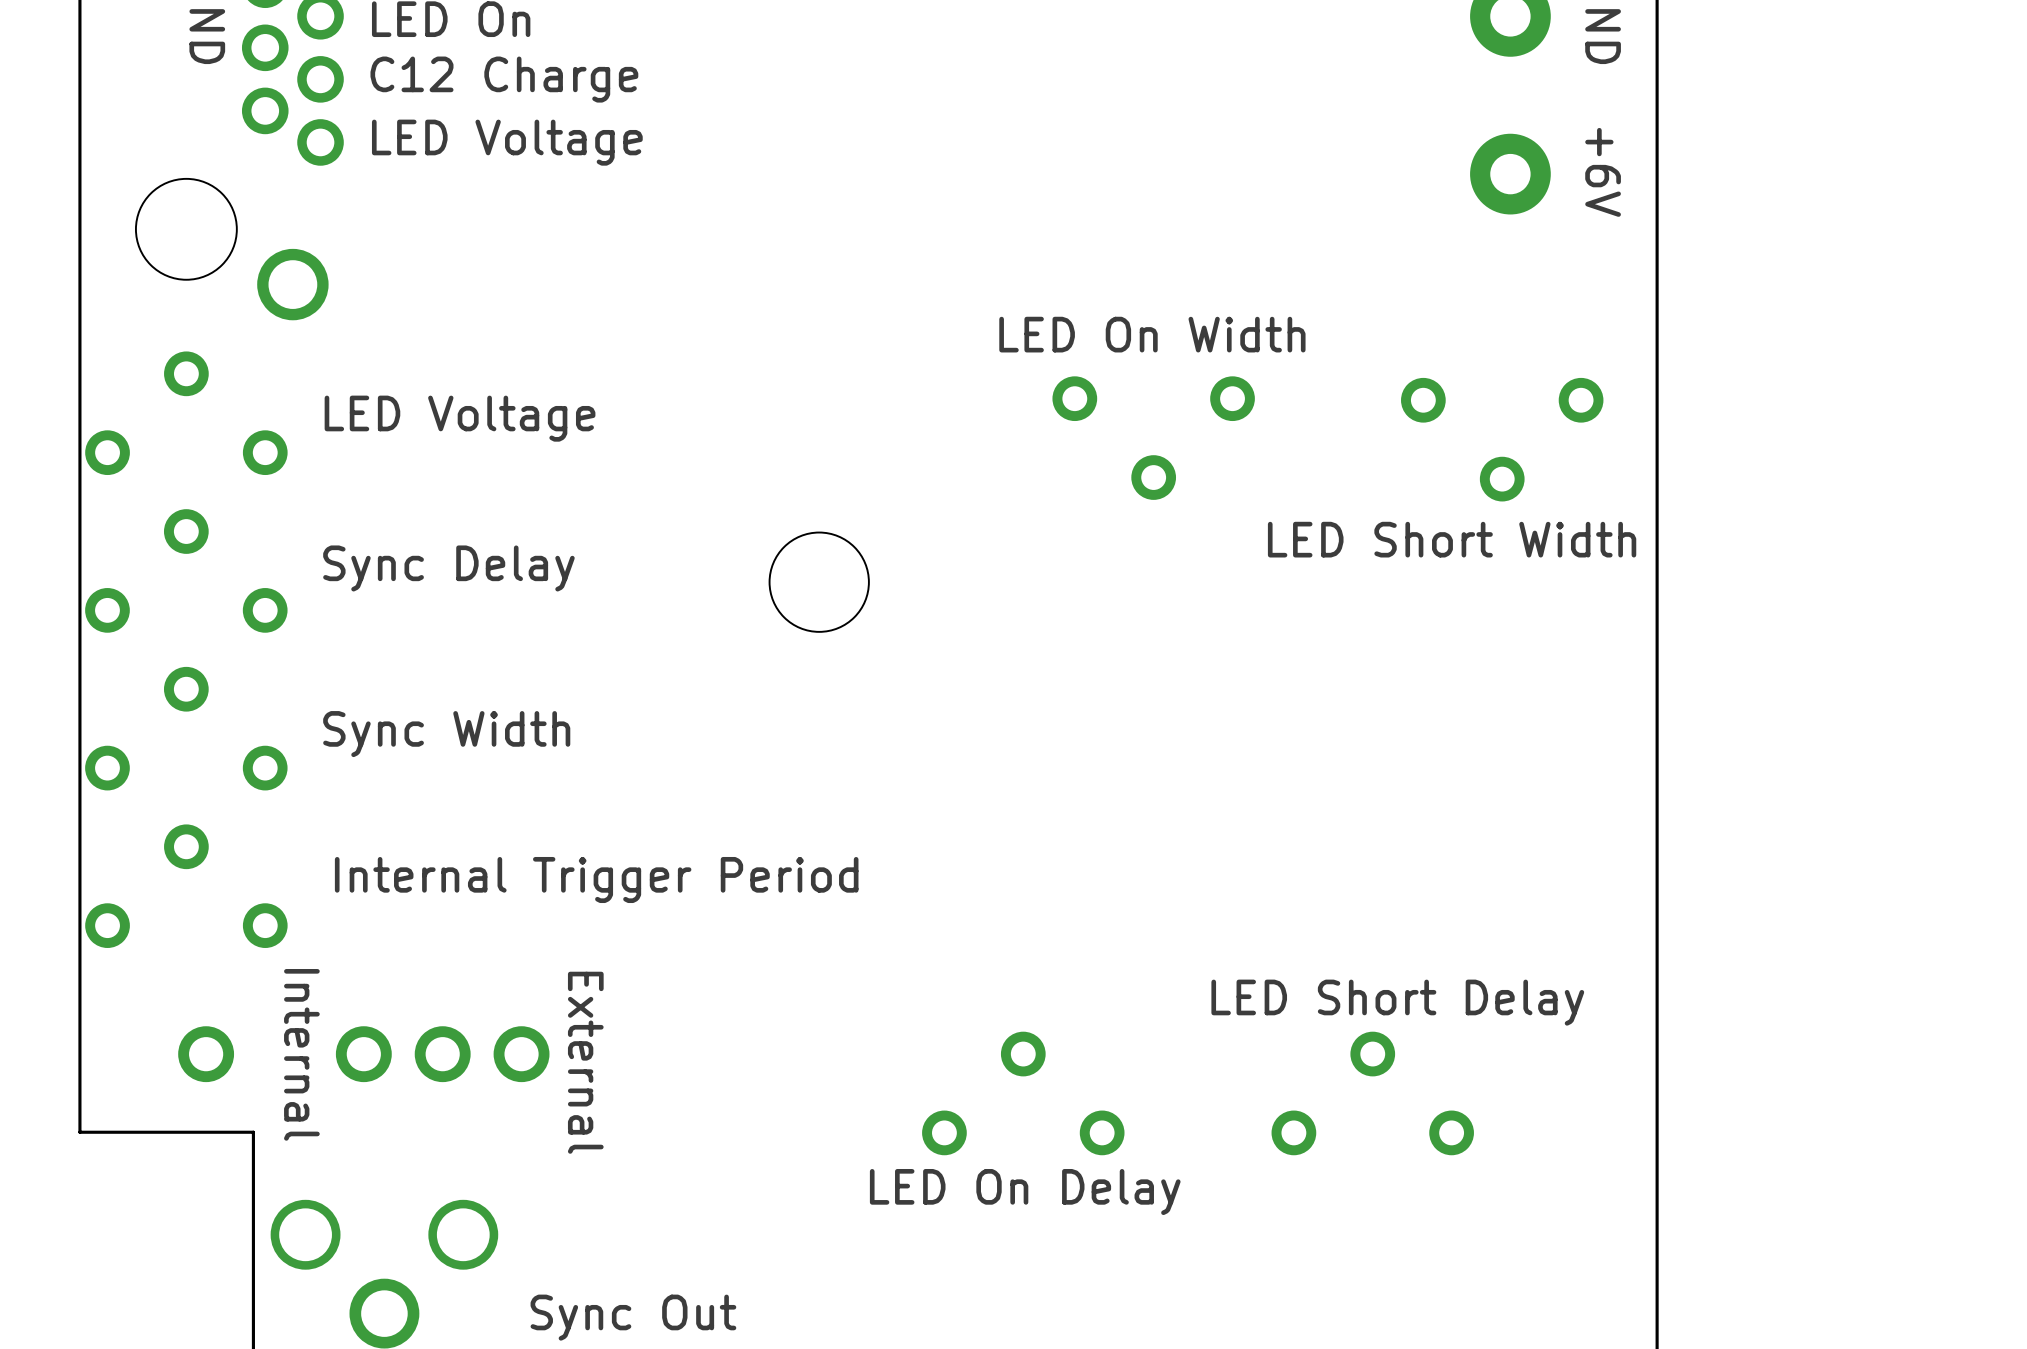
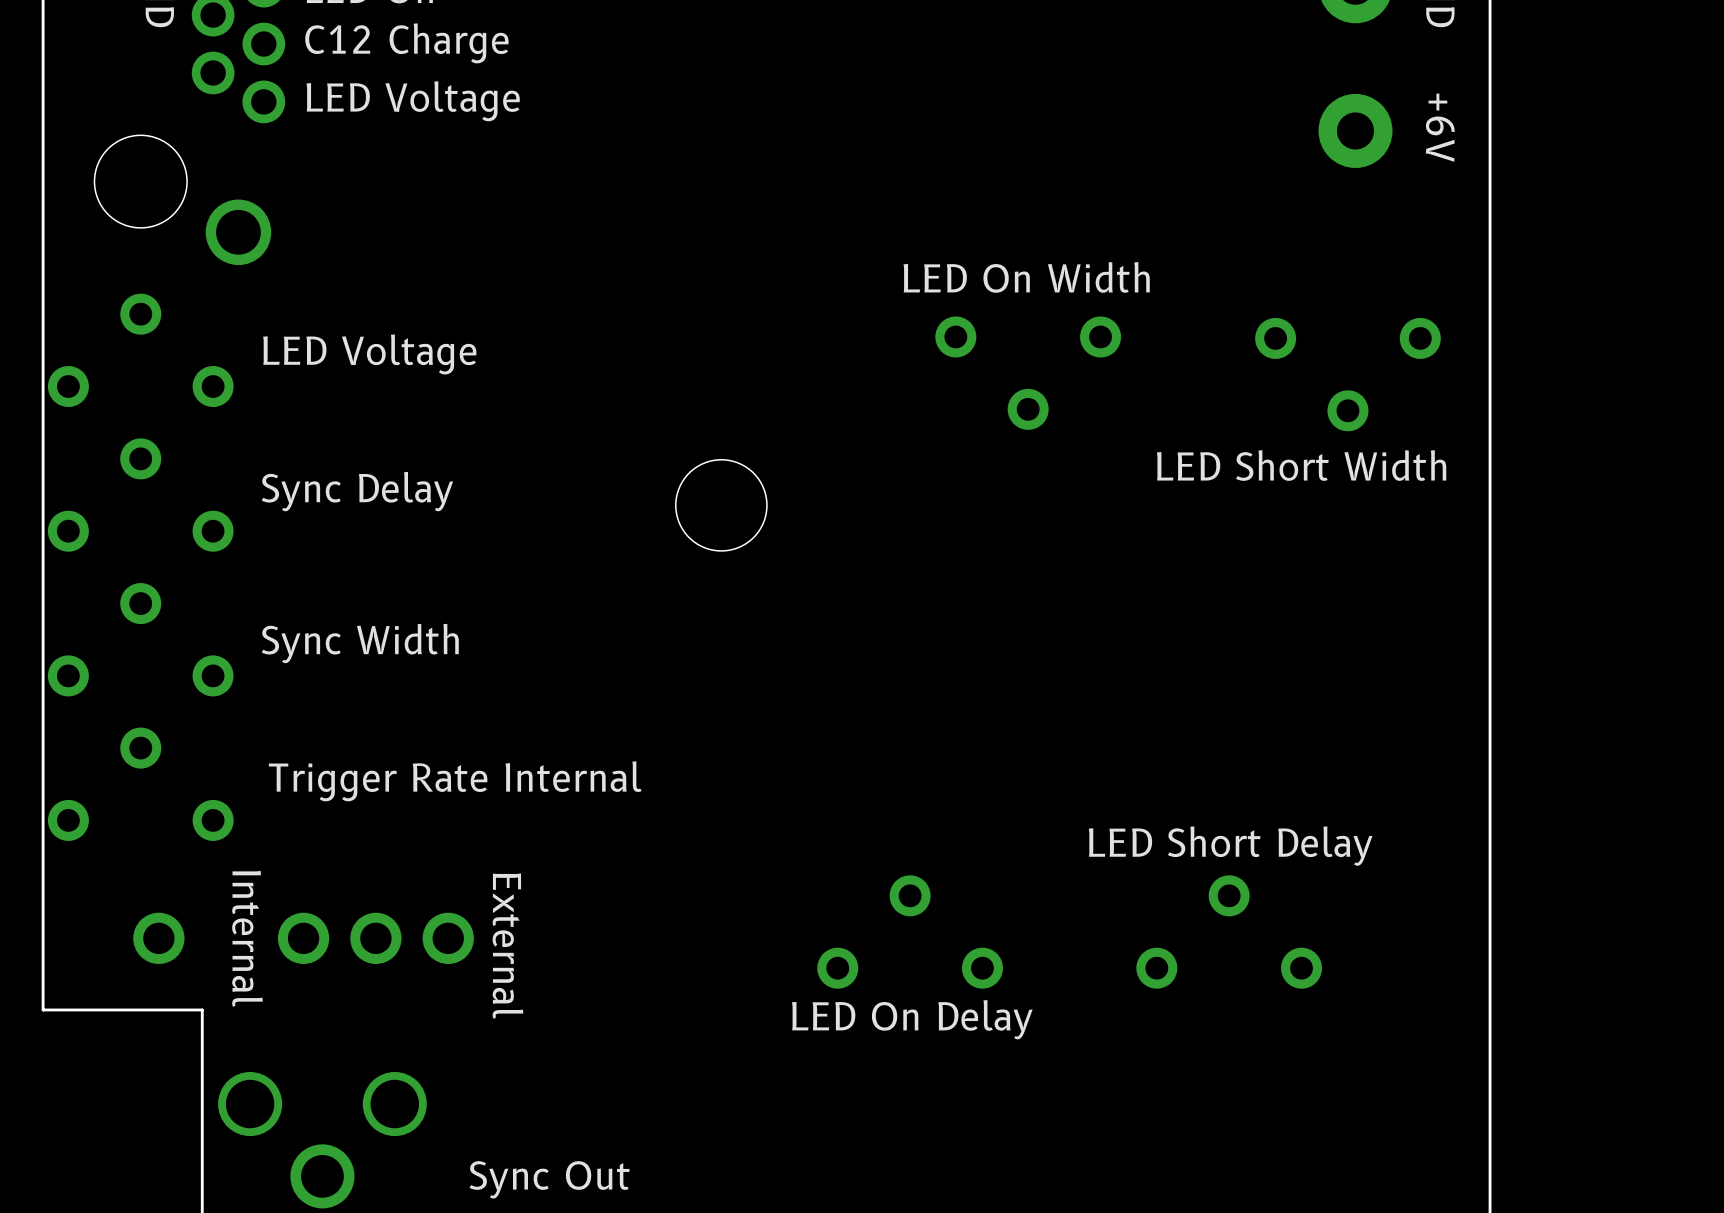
text: Internal Trigger Period (596, 880) -> Trigger Rate Internal (455, 781)
text position: LED Short Delay (1397, 1002) -> LED Short Delay (1230, 846)
part position: (1023, 1093) -> (910, 932)
part position: (1372, 1093) -> (1229, 932)
text position: LED On Delay (1025, 1192) -> LED On Delay (912, 1019)

